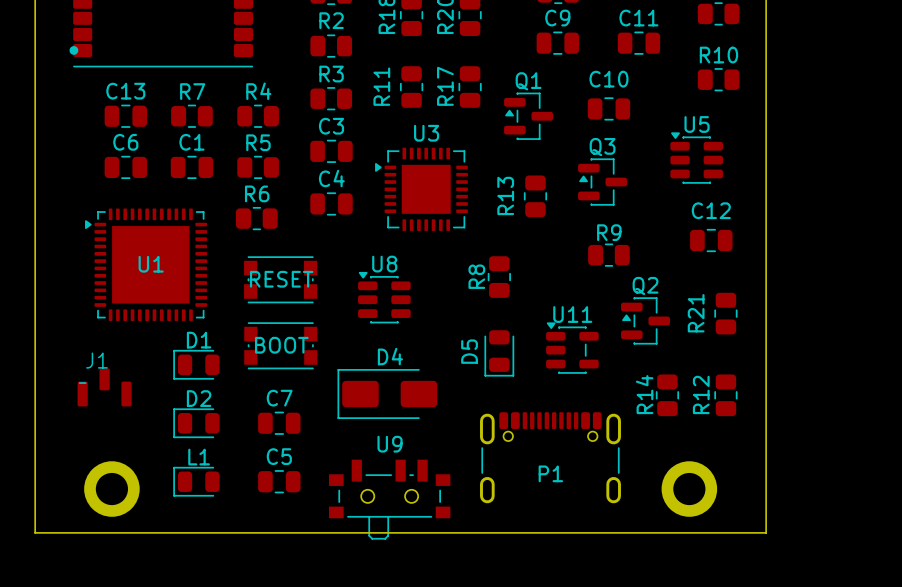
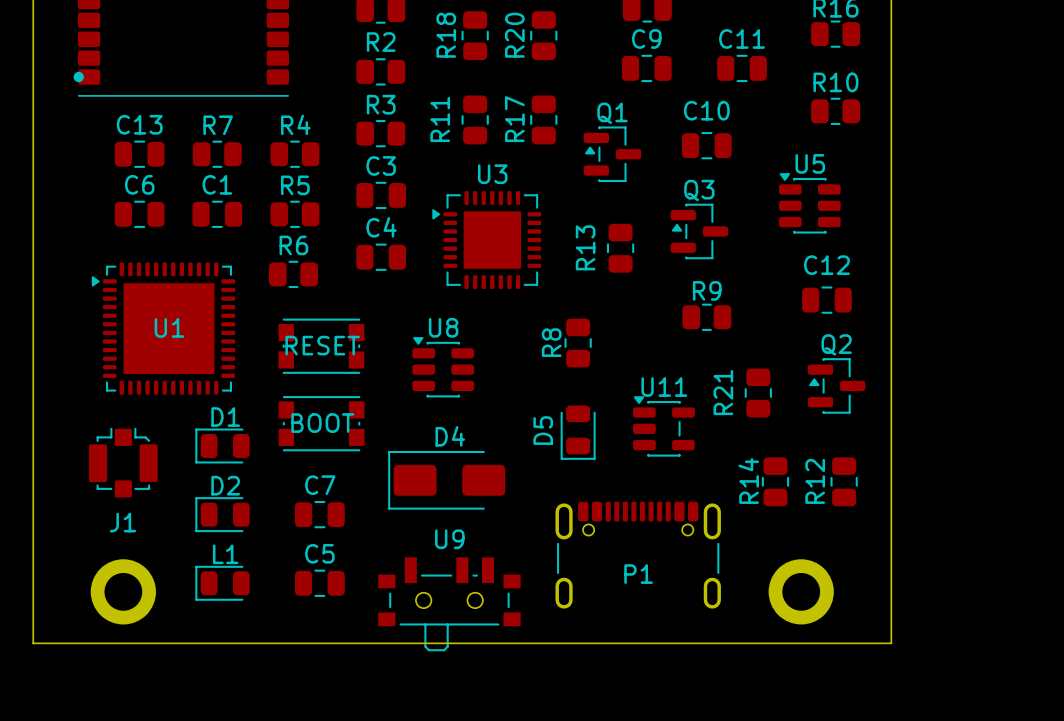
R21 position: (725, 313) -> (758, 393)
Q2 position: (645, 320) -> (836, 385)
J1 name position: J1 (96, 360) -> J1 (122, 522)
J1 footprint: [77, 368, 132, 407] -> [89, 427, 158, 498]

